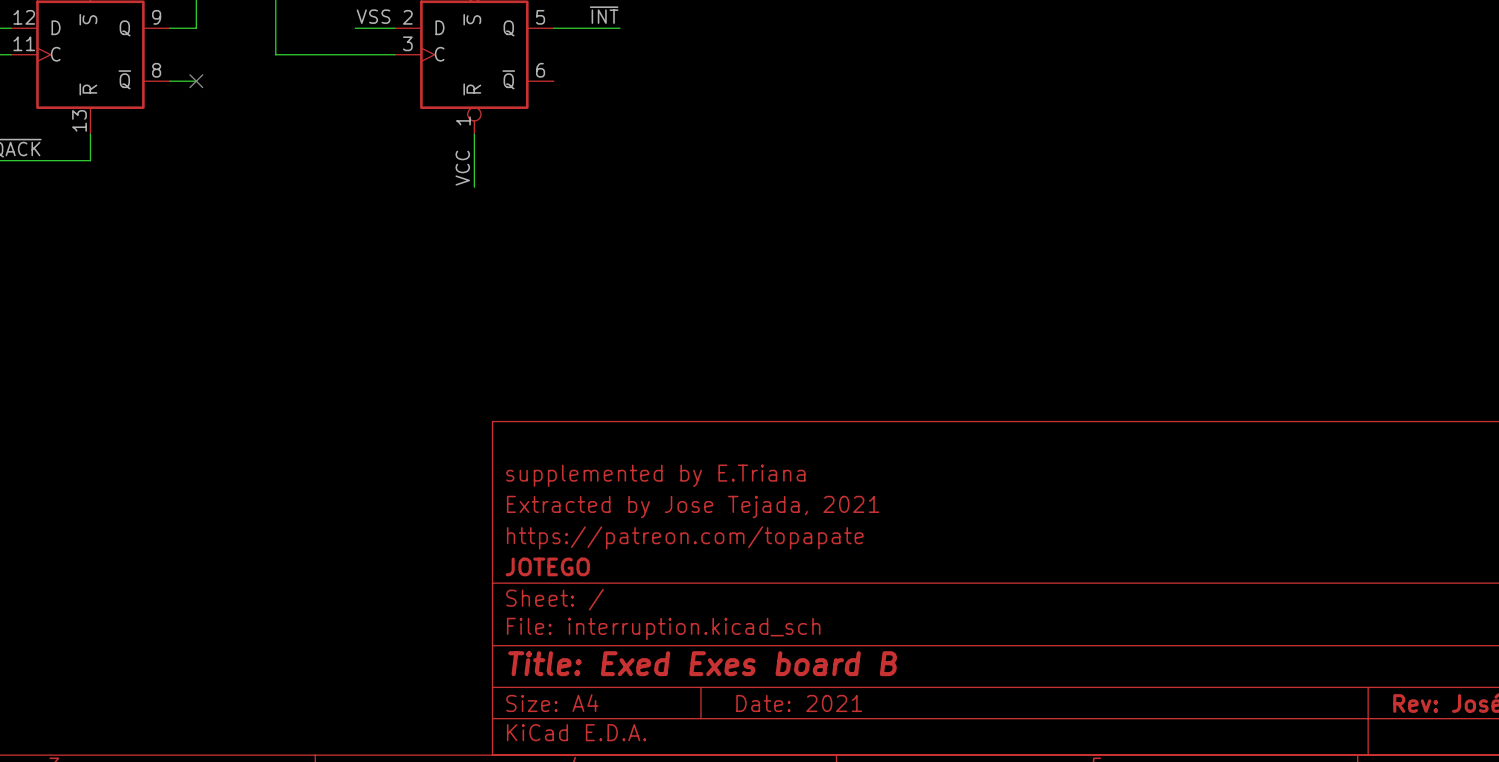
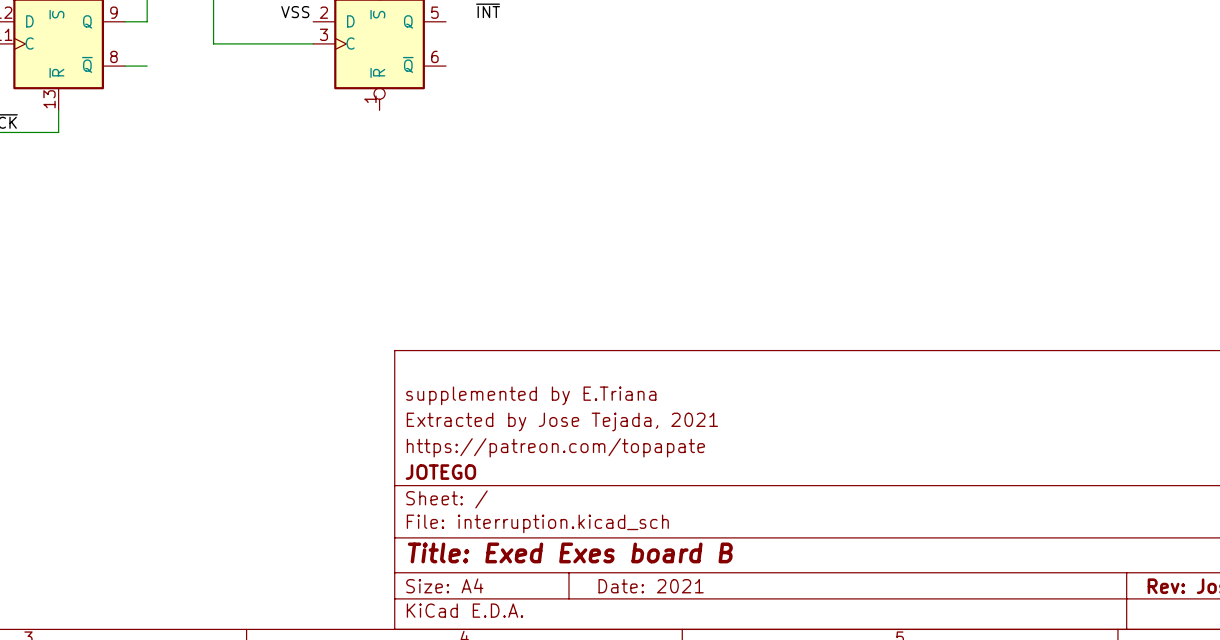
wire: (355, 28) (394, 28) -> none
wire: (553, 28) (619, 28) -> none
no-connect mark: (196, 81) -> none
wire: (474, 134) (474, 187) -> none
label: VCC (462, 168) -> none

